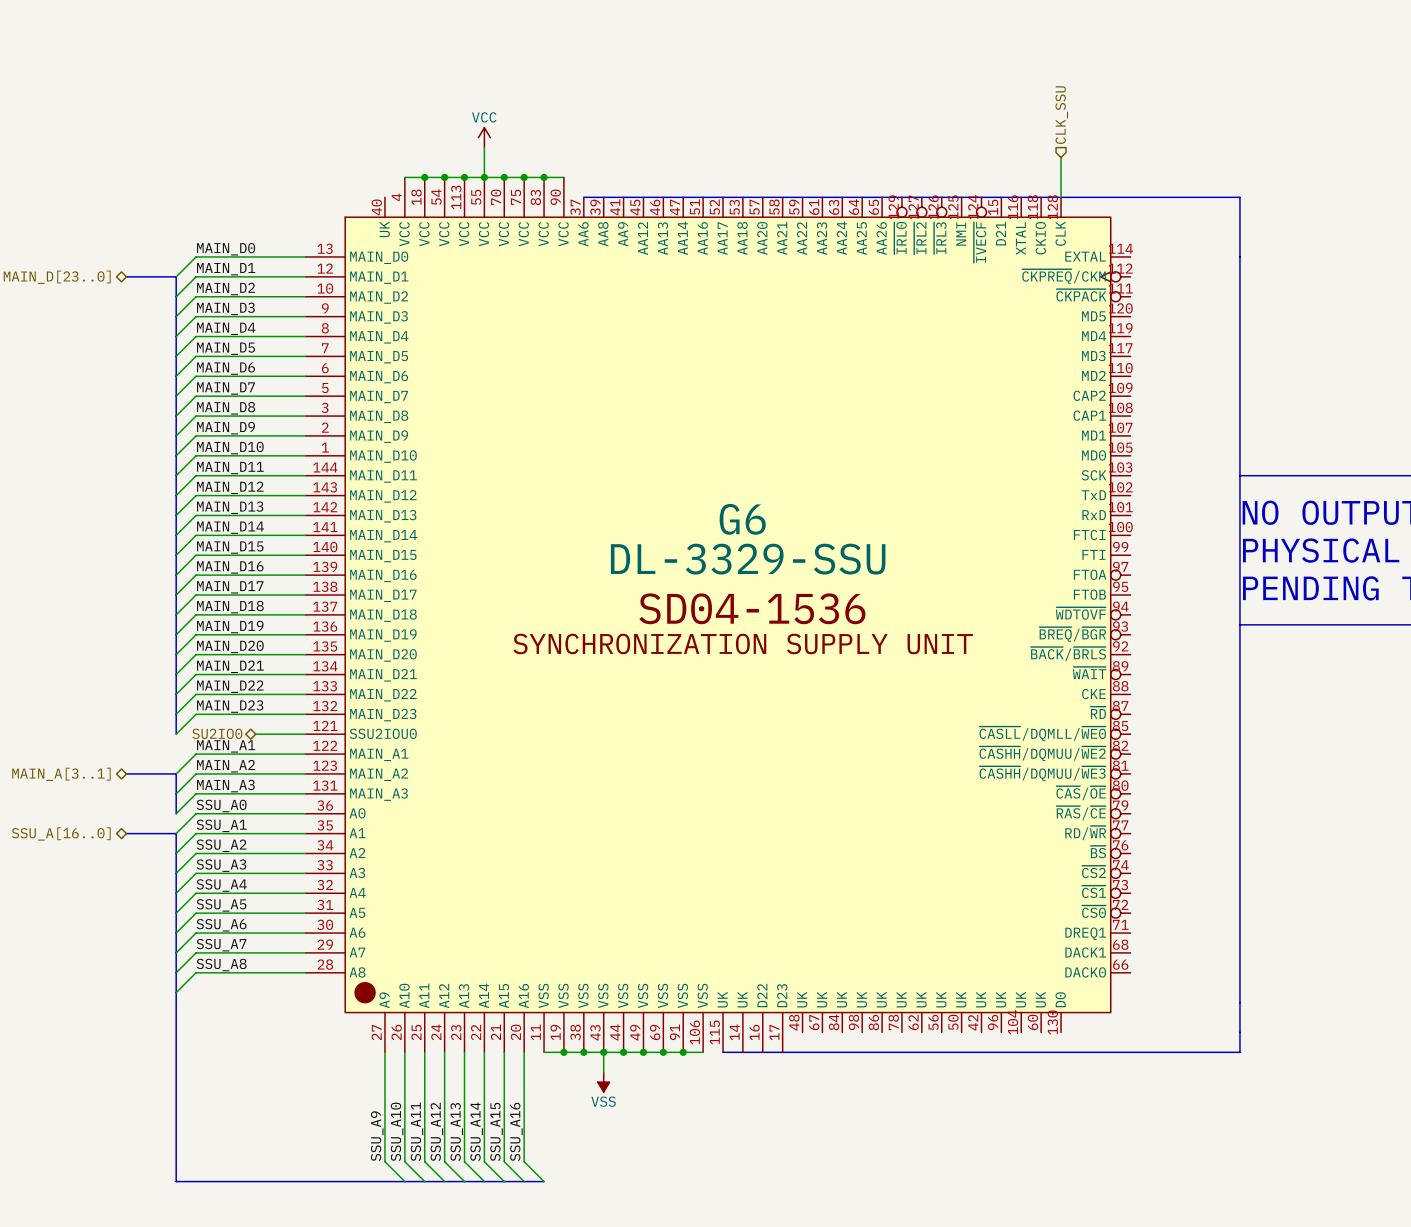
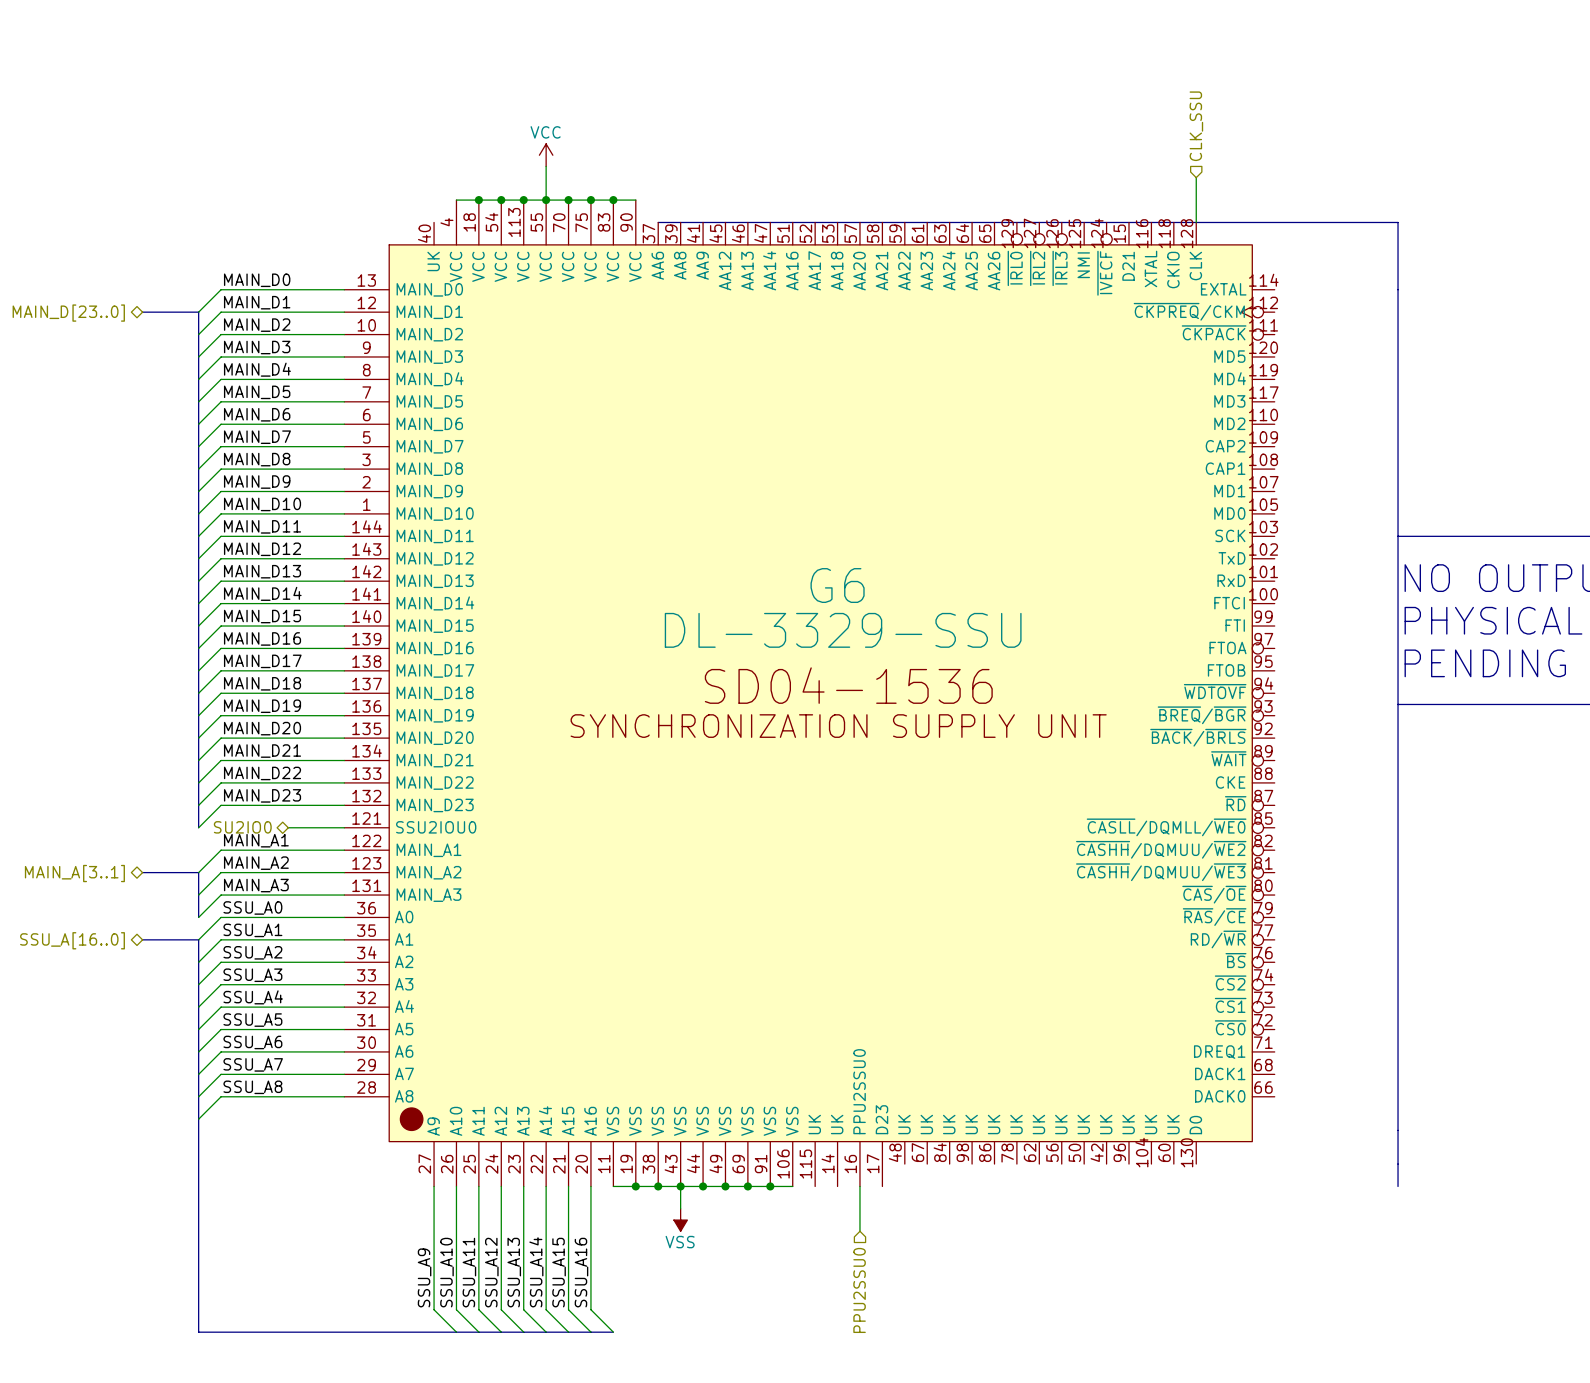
G6 pin name: D22 (762, 995) -> PPU2SSU0 (859, 1091)
line: (722, 1052) (1239, 1052) -> none
wire: none -> (859, 1186) (859, 1231)
hierarchical label: none -> PPU2SSU0 (859, 1290)

